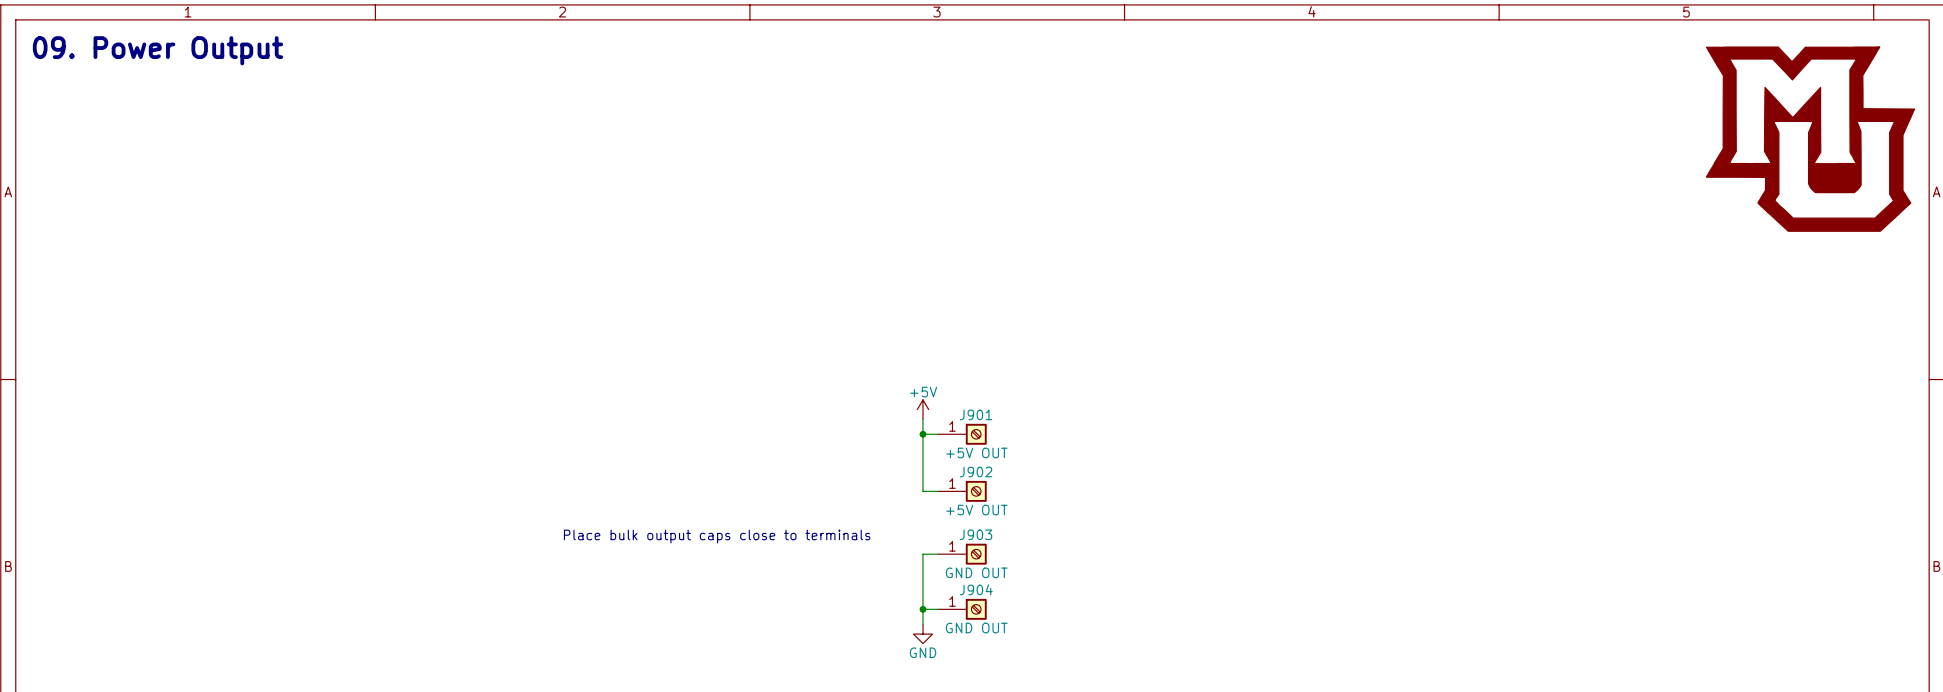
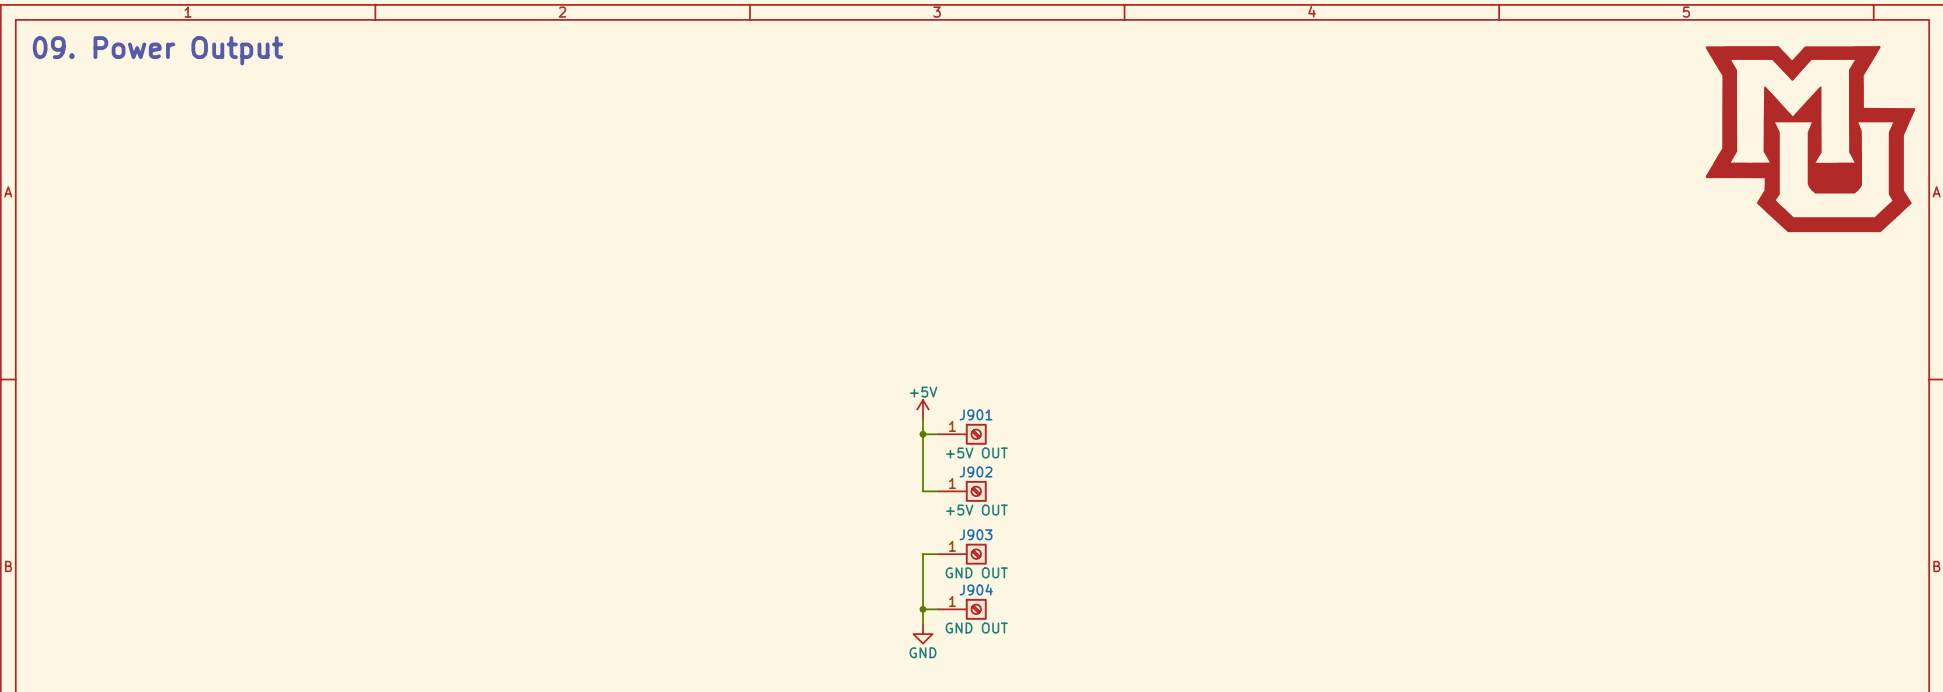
text: Place bulk output caps close to terminals (717, 536) -> none

